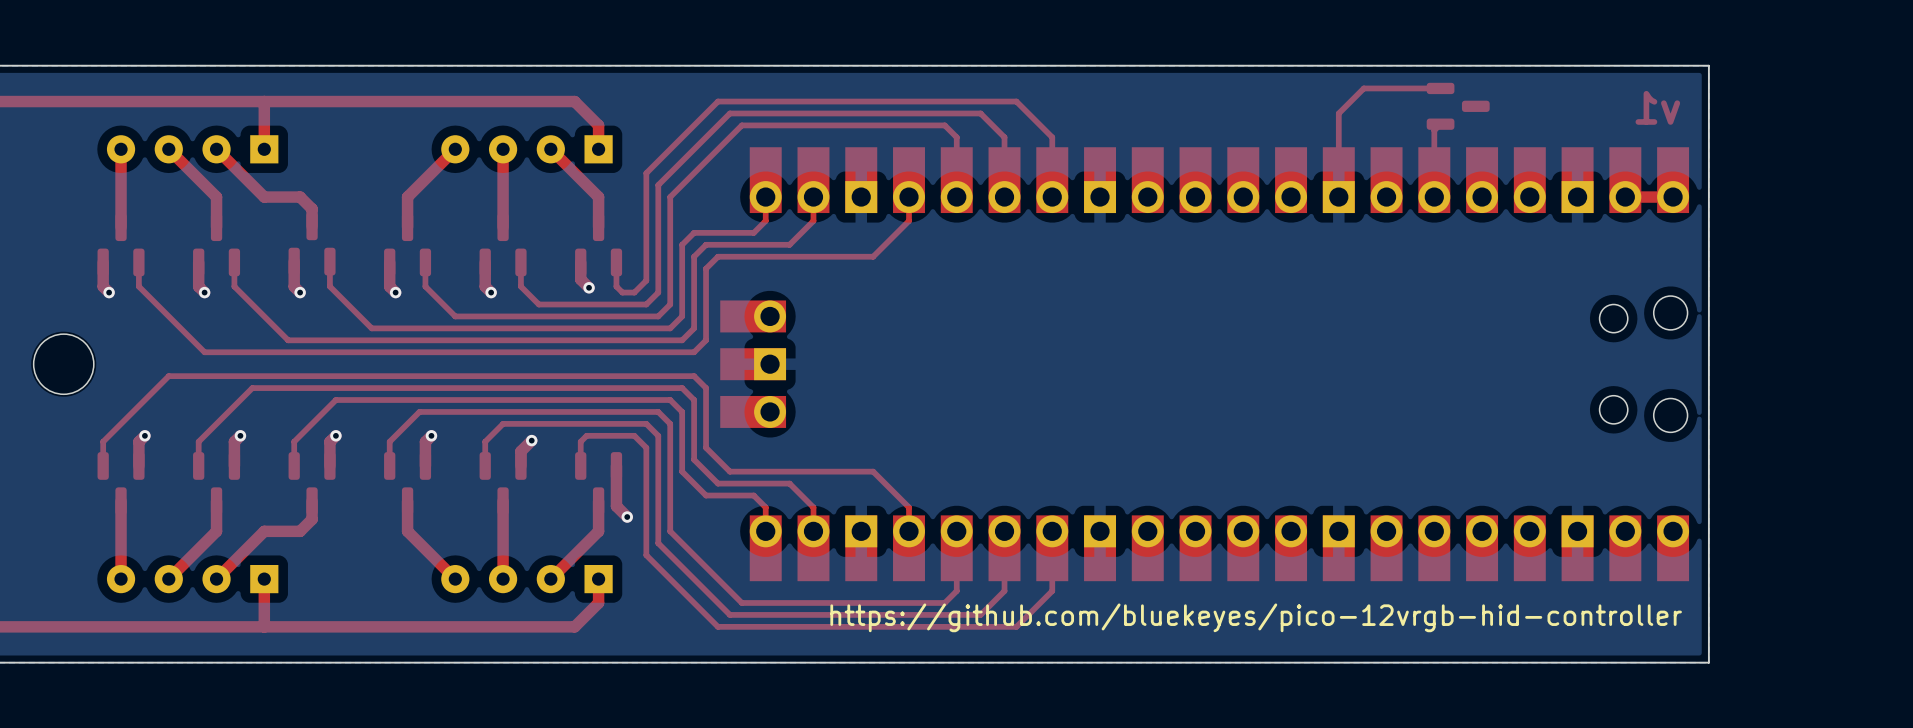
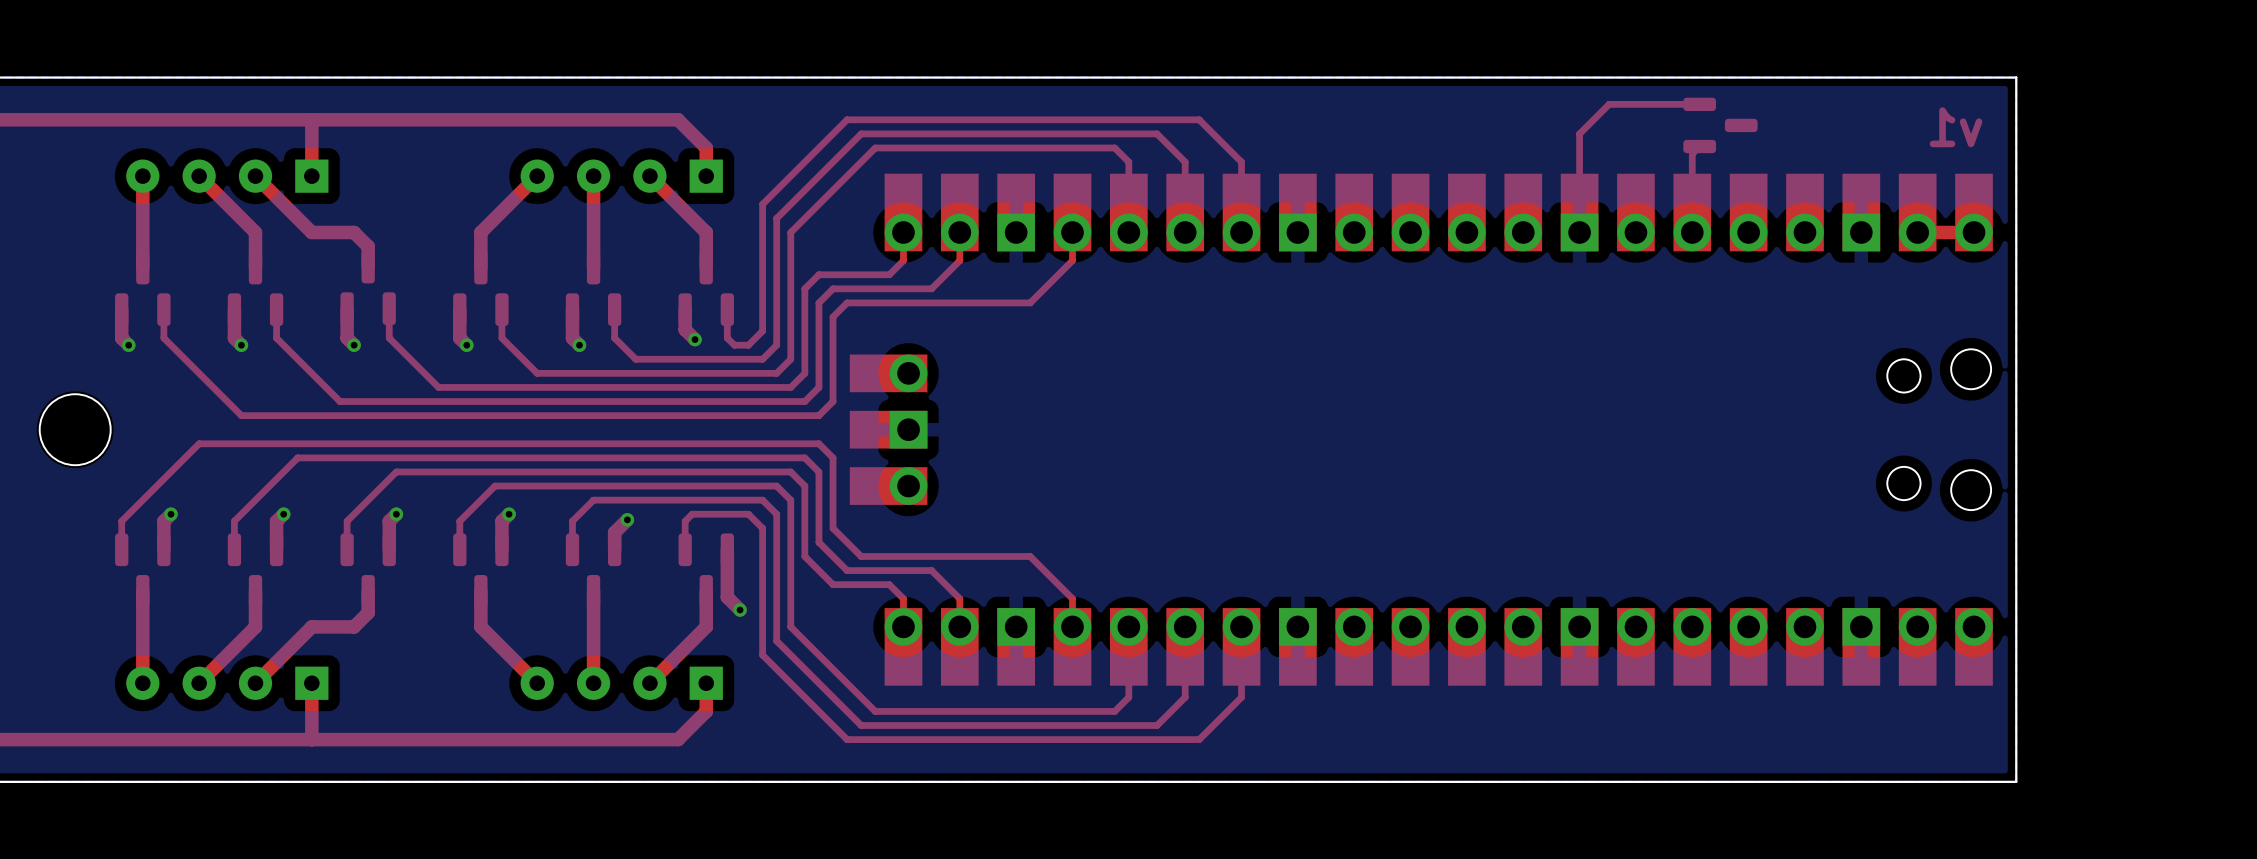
text: https://github.com/bluekeyes/pico-12vrgb-hid-controller (1256, 617) -> none

